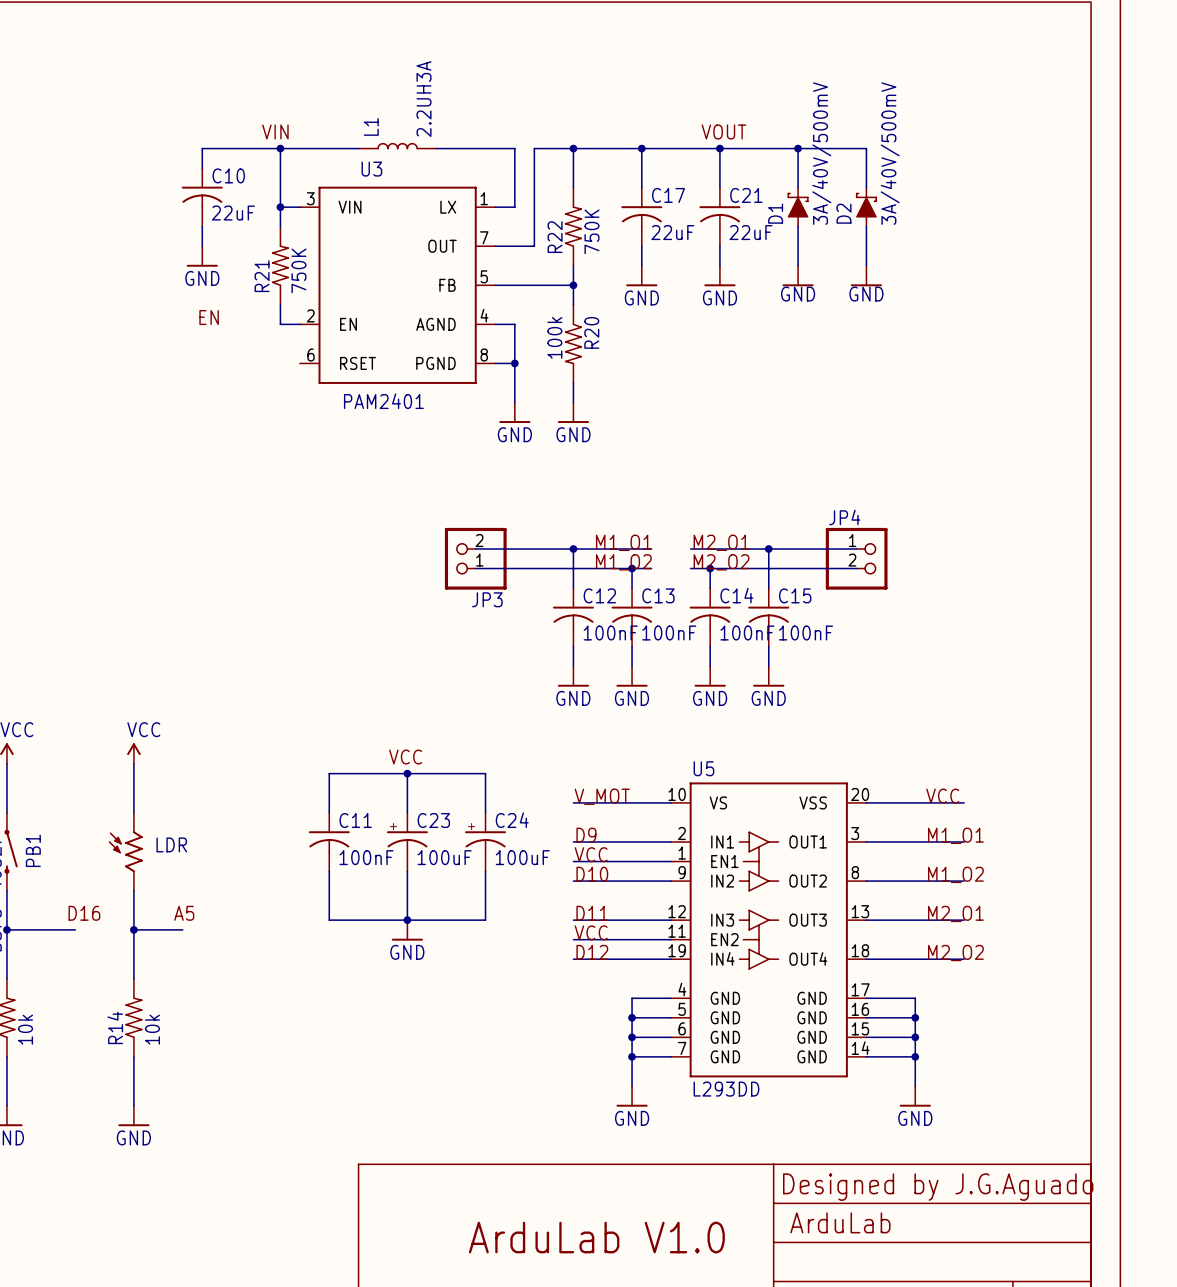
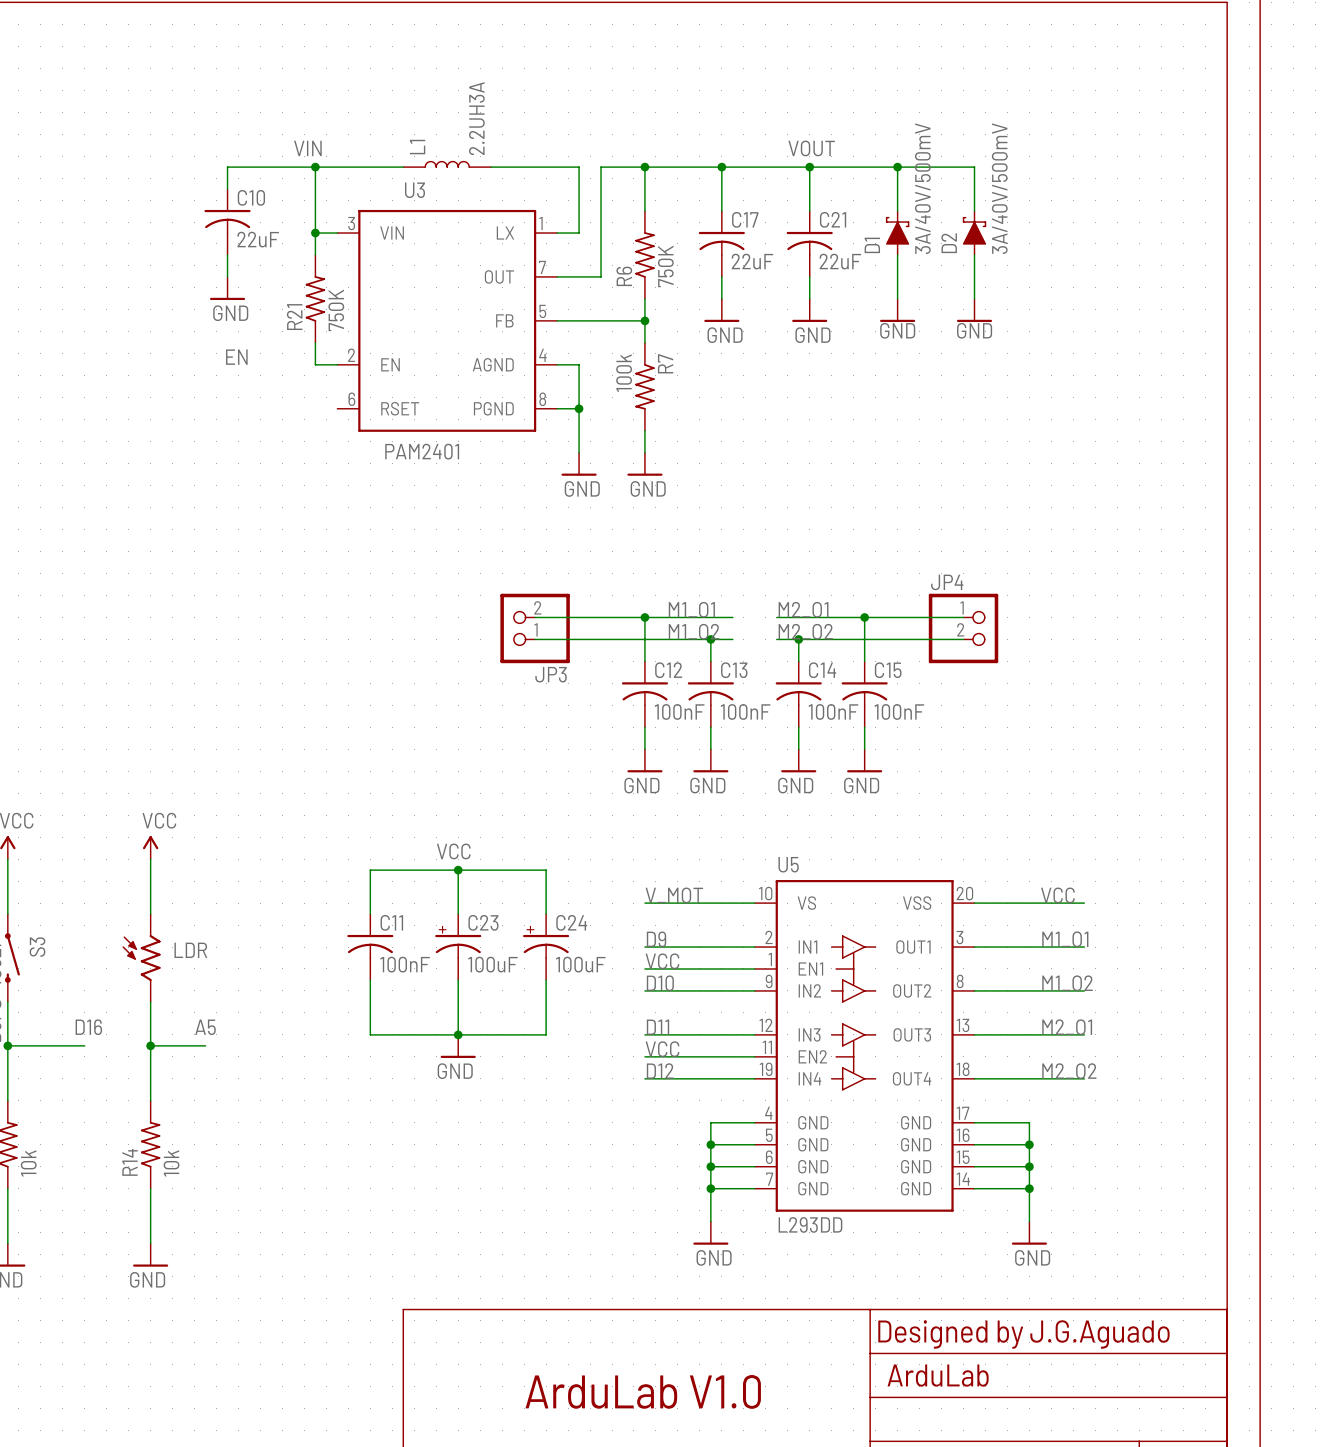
R22 name: R22 (555, 237) -> R6 (624, 276)
R20 name: R20 (591, 332) -> R7 (665, 363)
PB1 name: PB1 (33, 850) -> S3 (37, 947)

